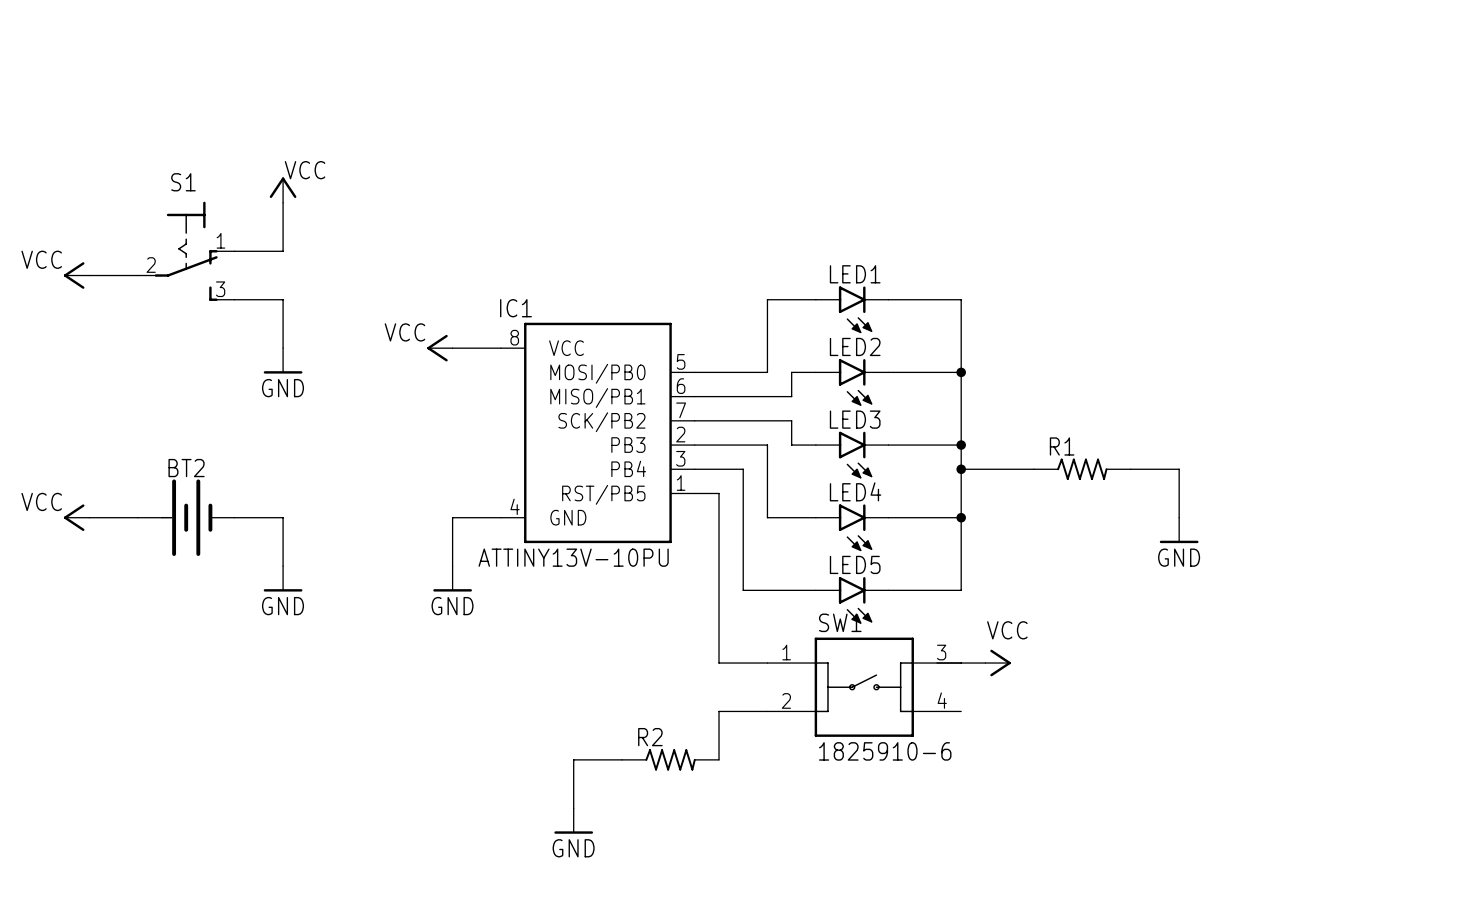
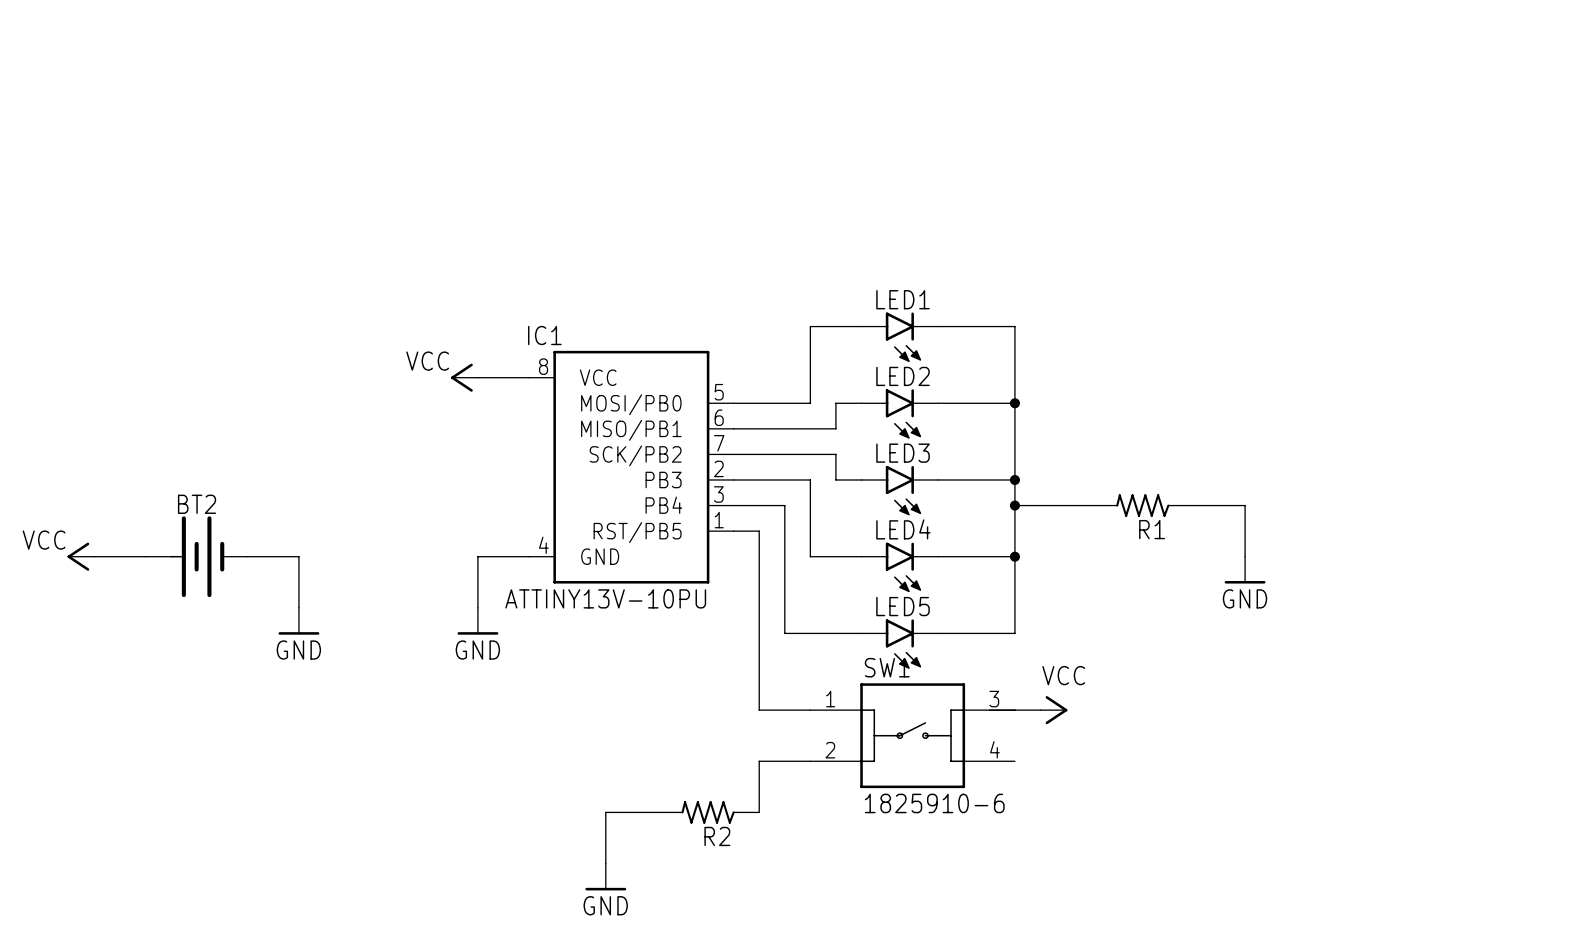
power symbol: VCC (283, 190) -> none
wire: (283, 202) (283, 251) (234, 251) -> none
S1: (186, 251) -> none
power symbol: VCC (76, 275) -> none
wire: (89, 275) (137, 275) -> none
wire: (234, 299) (283, 299) (283, 348) -> none
power symbol: GND (283, 360) -> none
R1 rotation: 0° (1082, 469) -> 180° (1142, 505)
R2 rotation: 0° (670, 759) -> 180° (708, 812)

